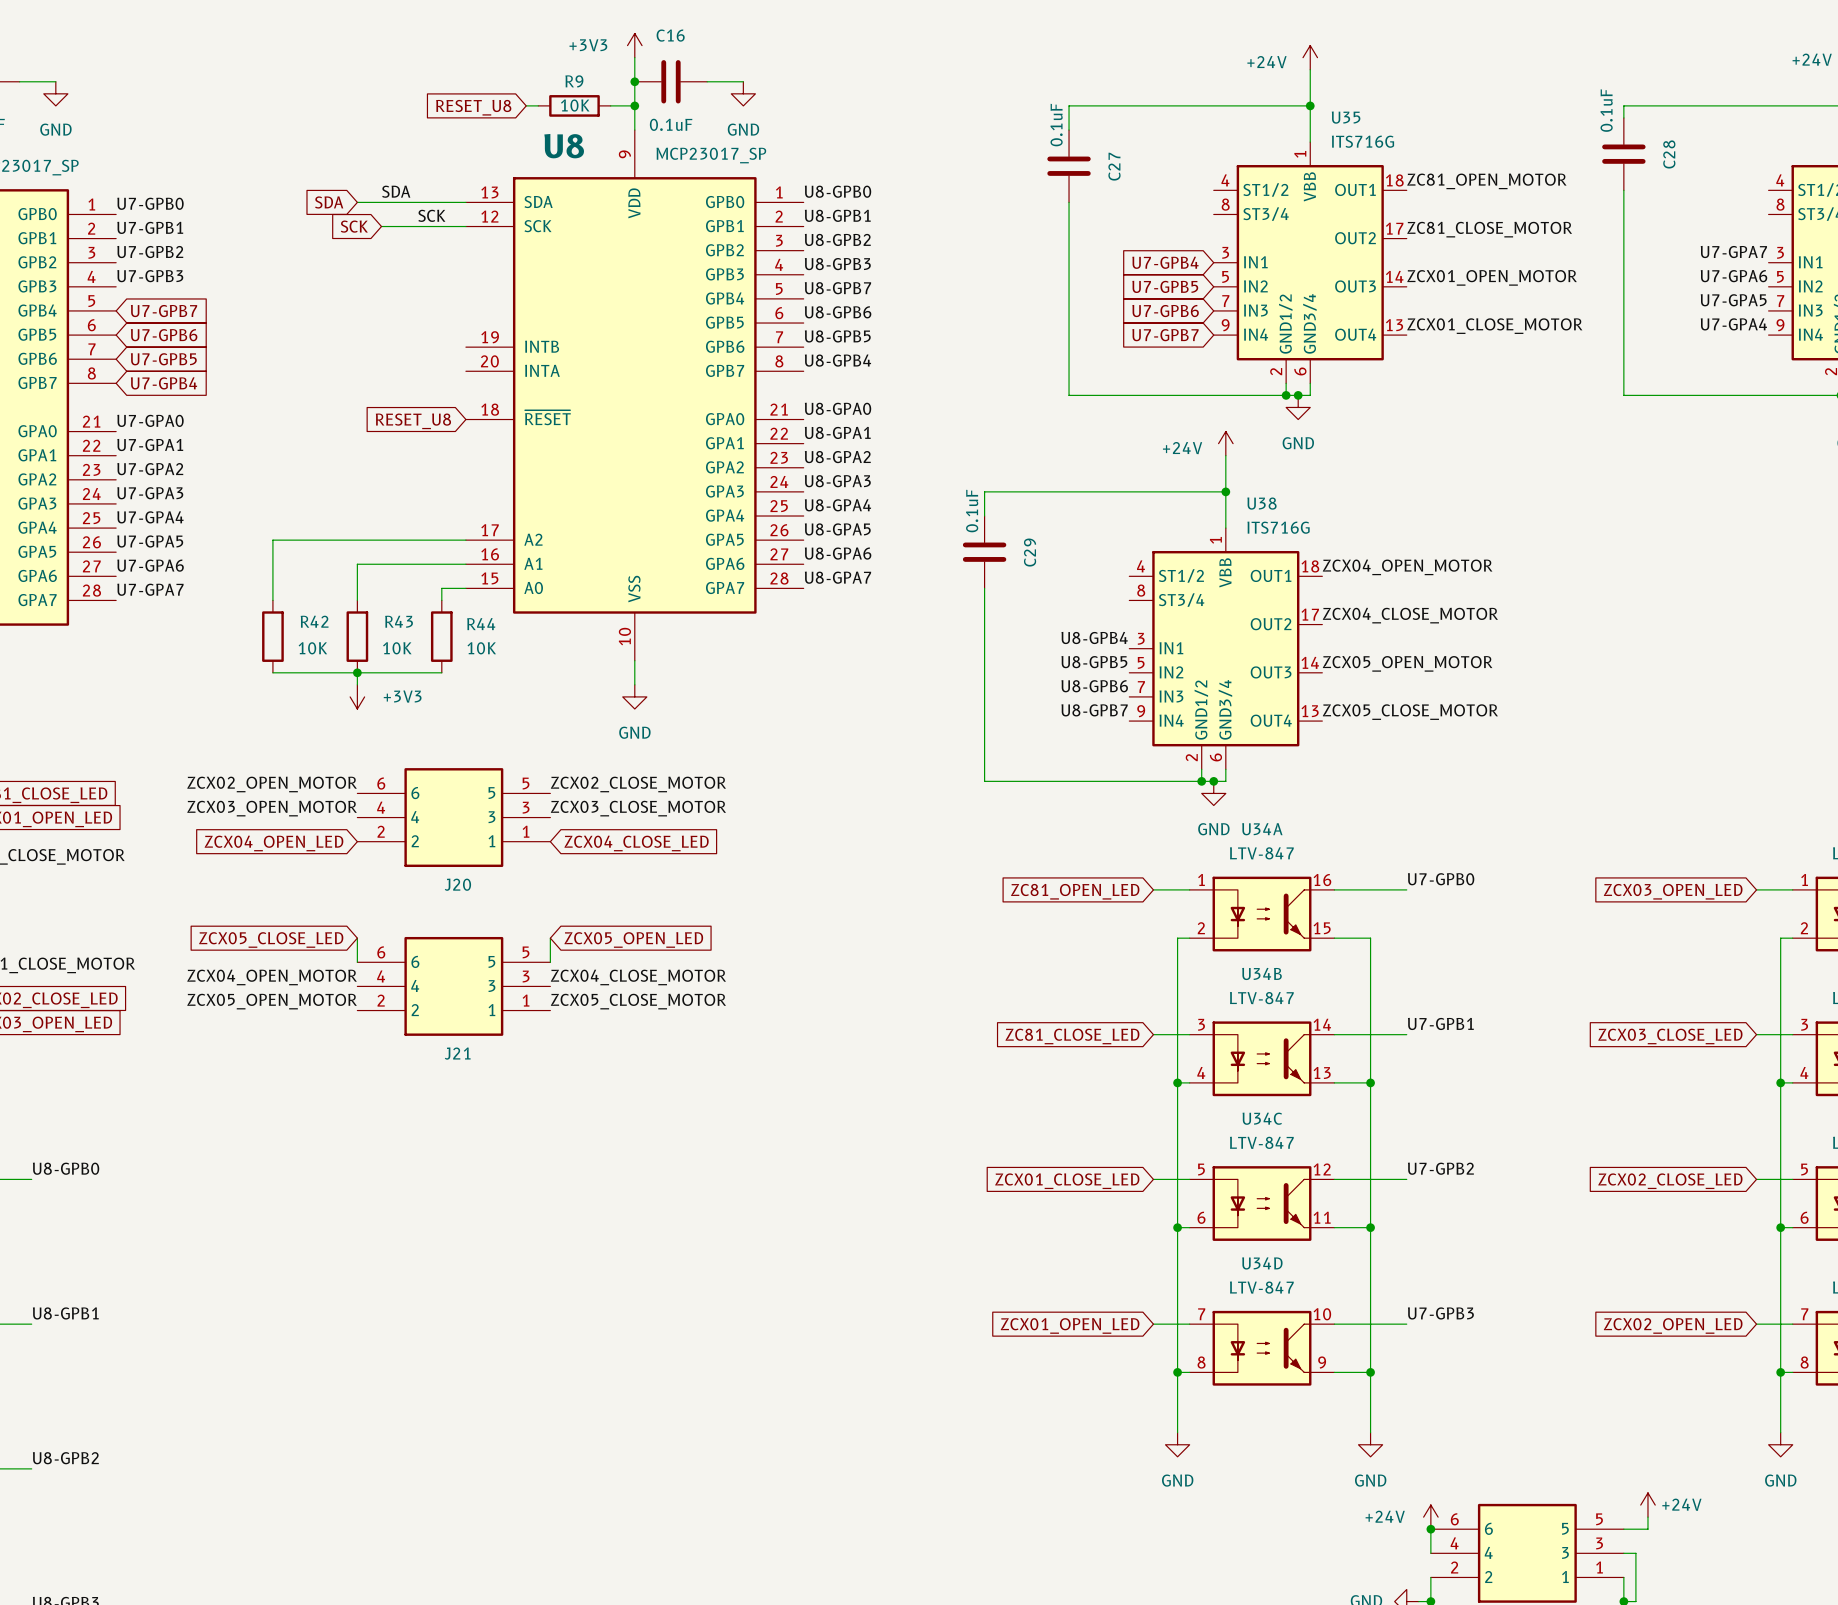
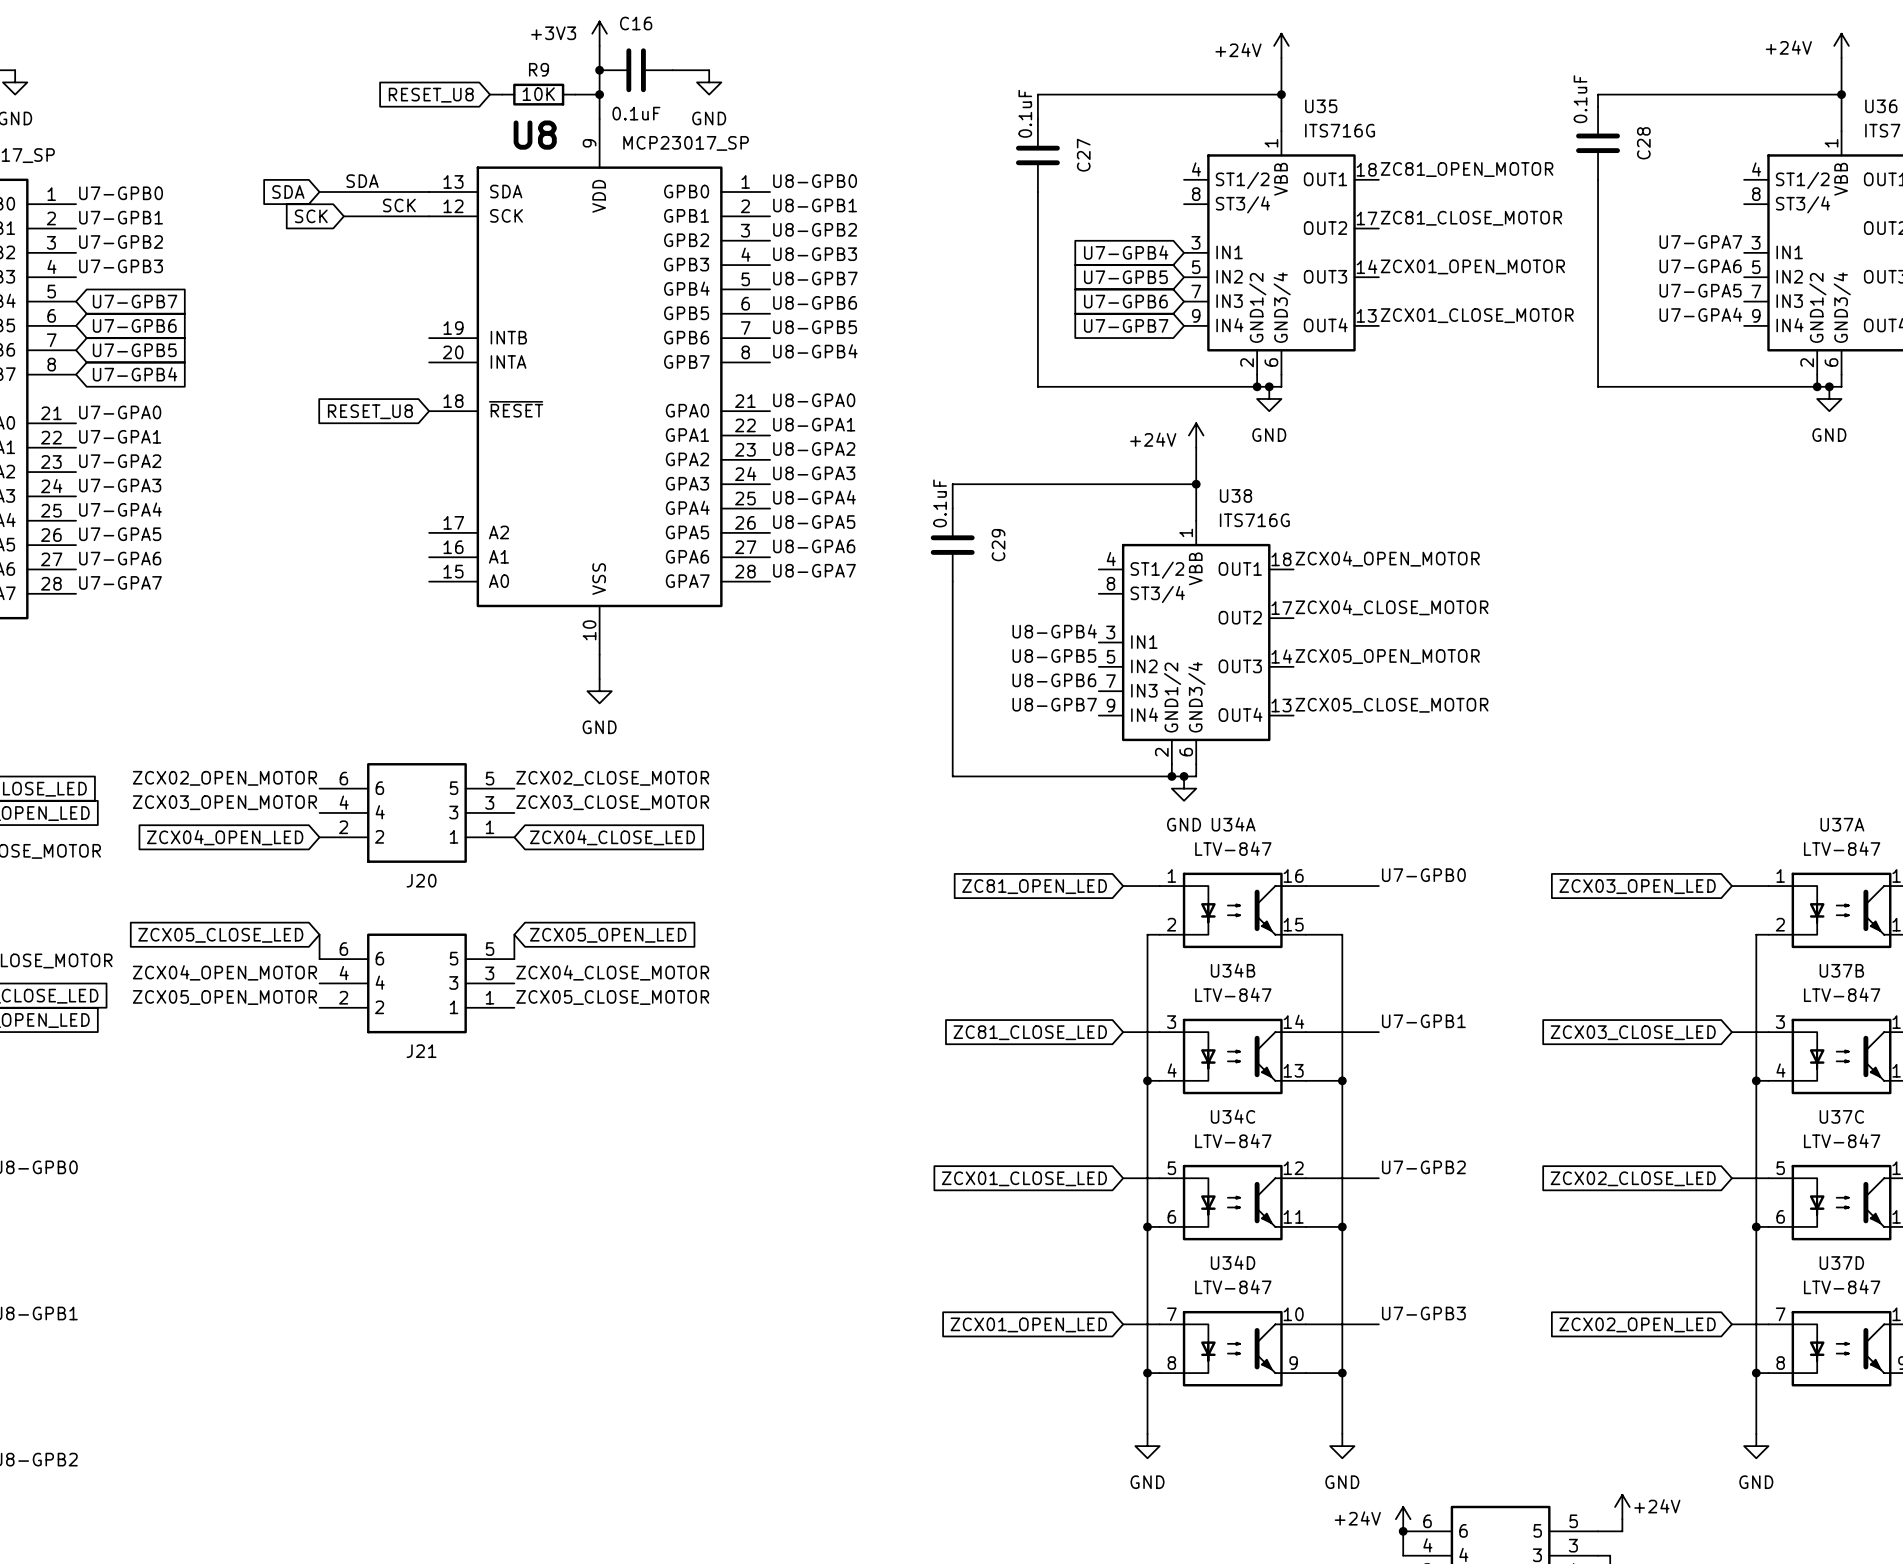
wire: (465, 540) (272, 540) (272, 600) -> none
wire: (465, 564) (357, 564) (357, 600) -> none
wire: (465, 588) (441, 588) (441, 600) -> none
R42: 10K (272, 636) -> none
R43: 10K (357, 636) -> none
R44: 10K (441, 636) -> none
wire: (272, 672) (441, 672) -> none
wire: (357, 672) (357, 684) -> none
junction: (357, 672) -> none
power symbol: +3V3 (357, 696) -> none

